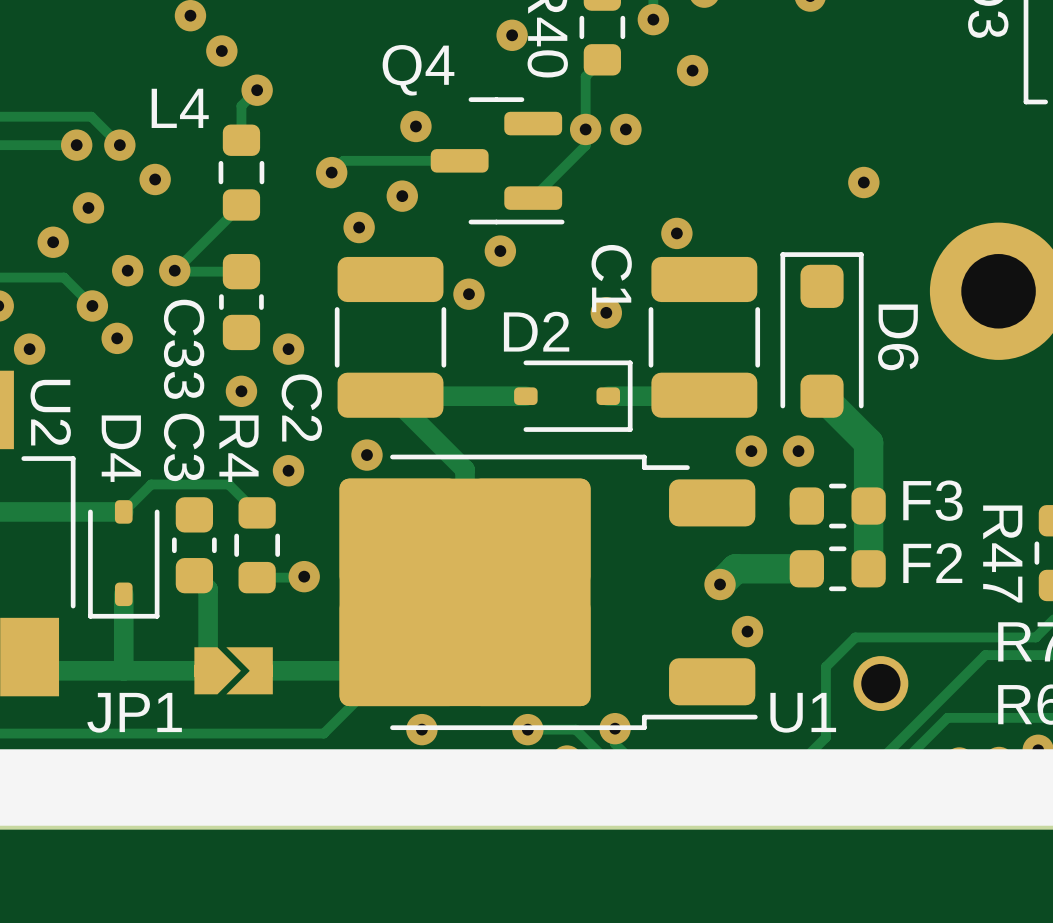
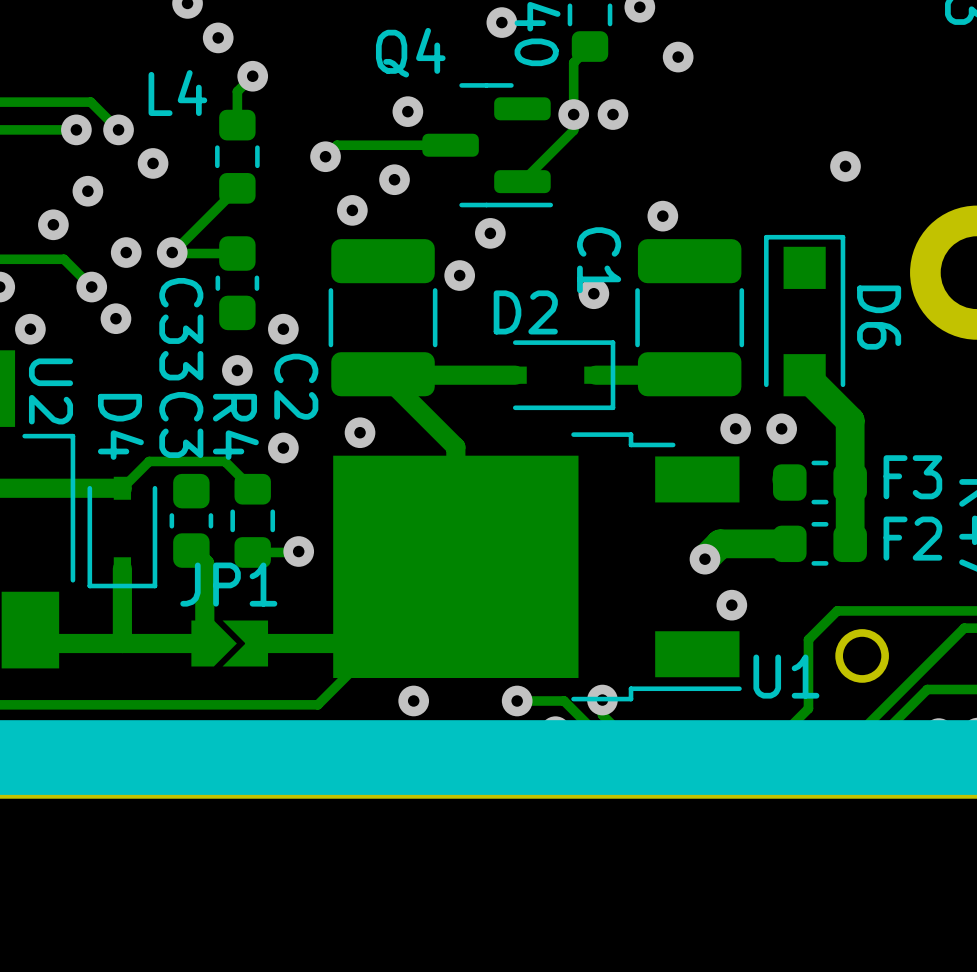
D6 footprint: [780, 252, 864, 418] -> [764, 234, 846, 397]
D2 footprint: [514, 360, 633, 432] -> [503, 340, 616, 411]
U1 footprint: [339, 454, 758, 731] -> [333, 432, 742, 702]
D4 footprint: [88, 500, 160, 619] -> [87, 476, 158, 589]
JP1 name position: JP1 (134, 712) -> JP1 (228, 584)

